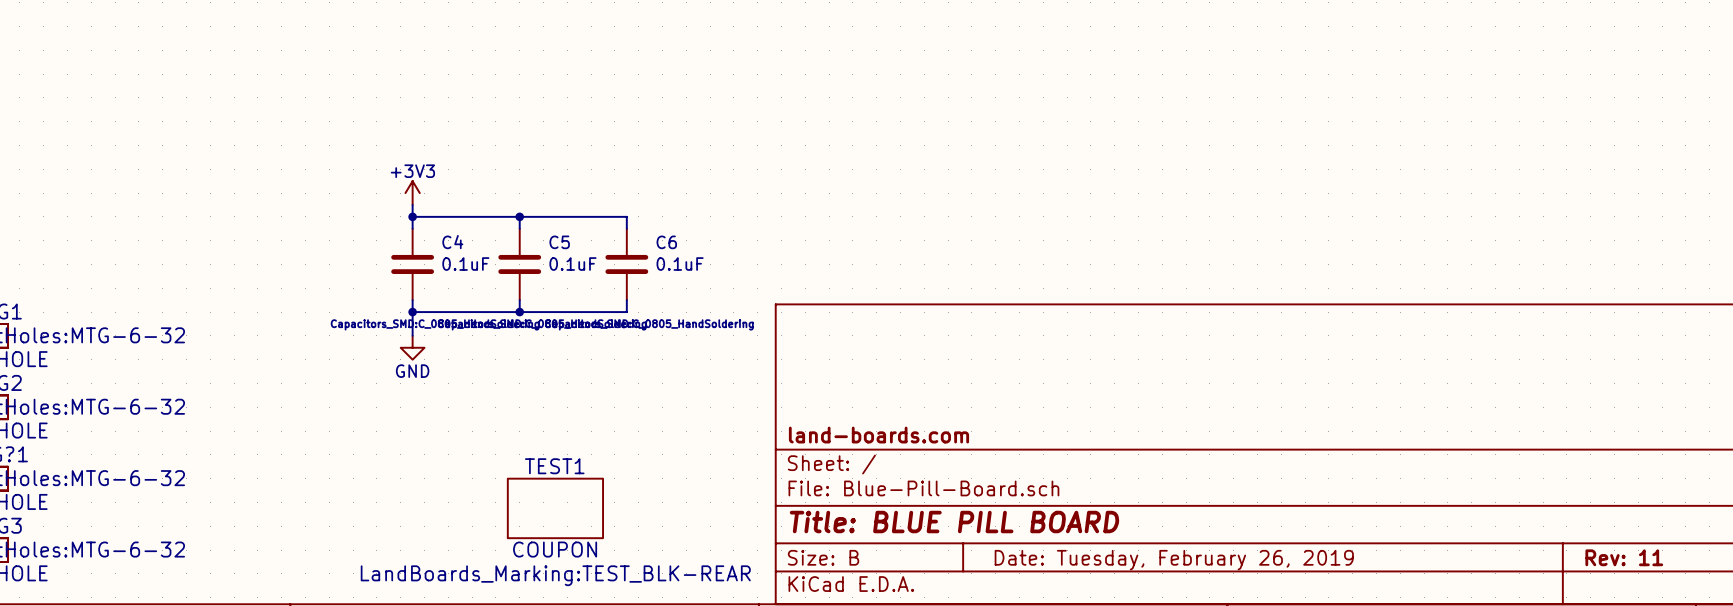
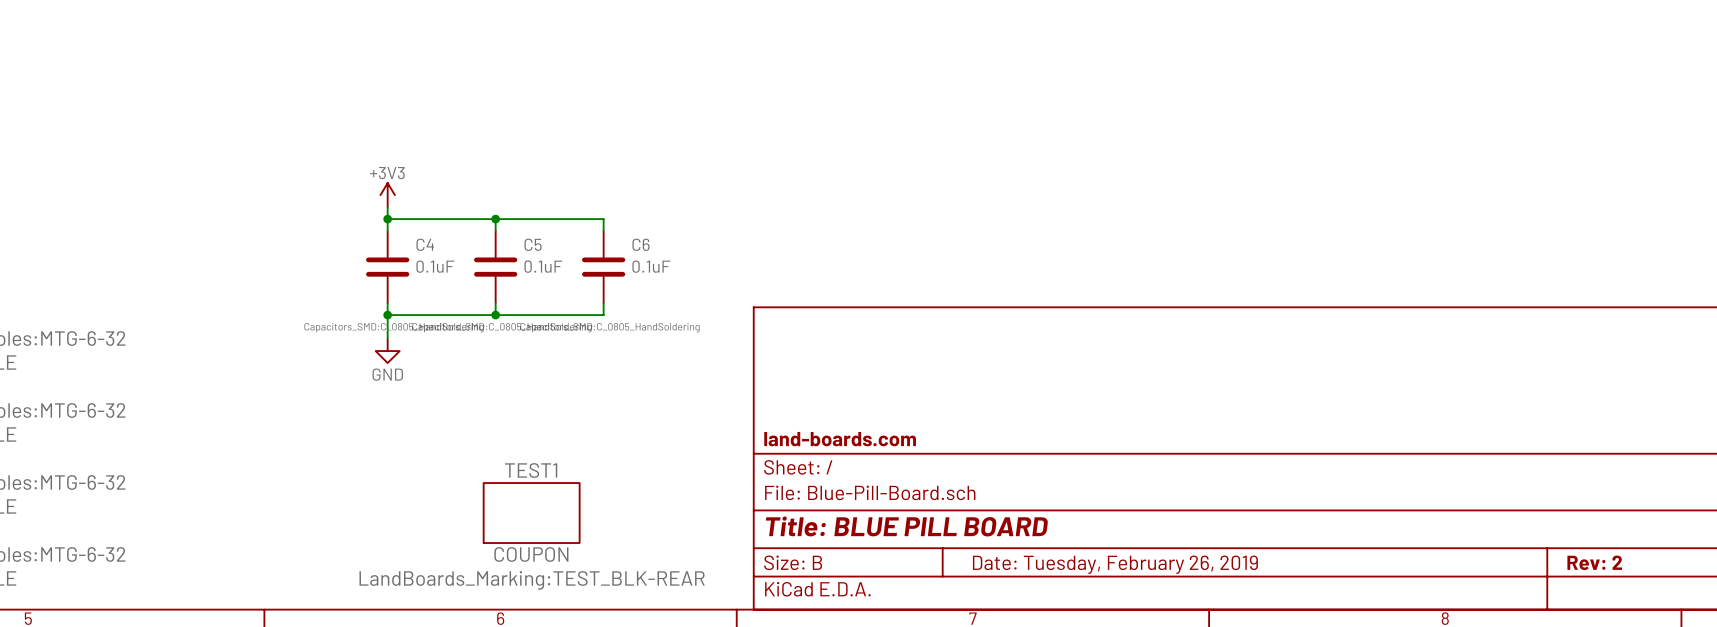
title block: Rev: 11 (1624, 557) -> Rev: 2 (1594, 562)

